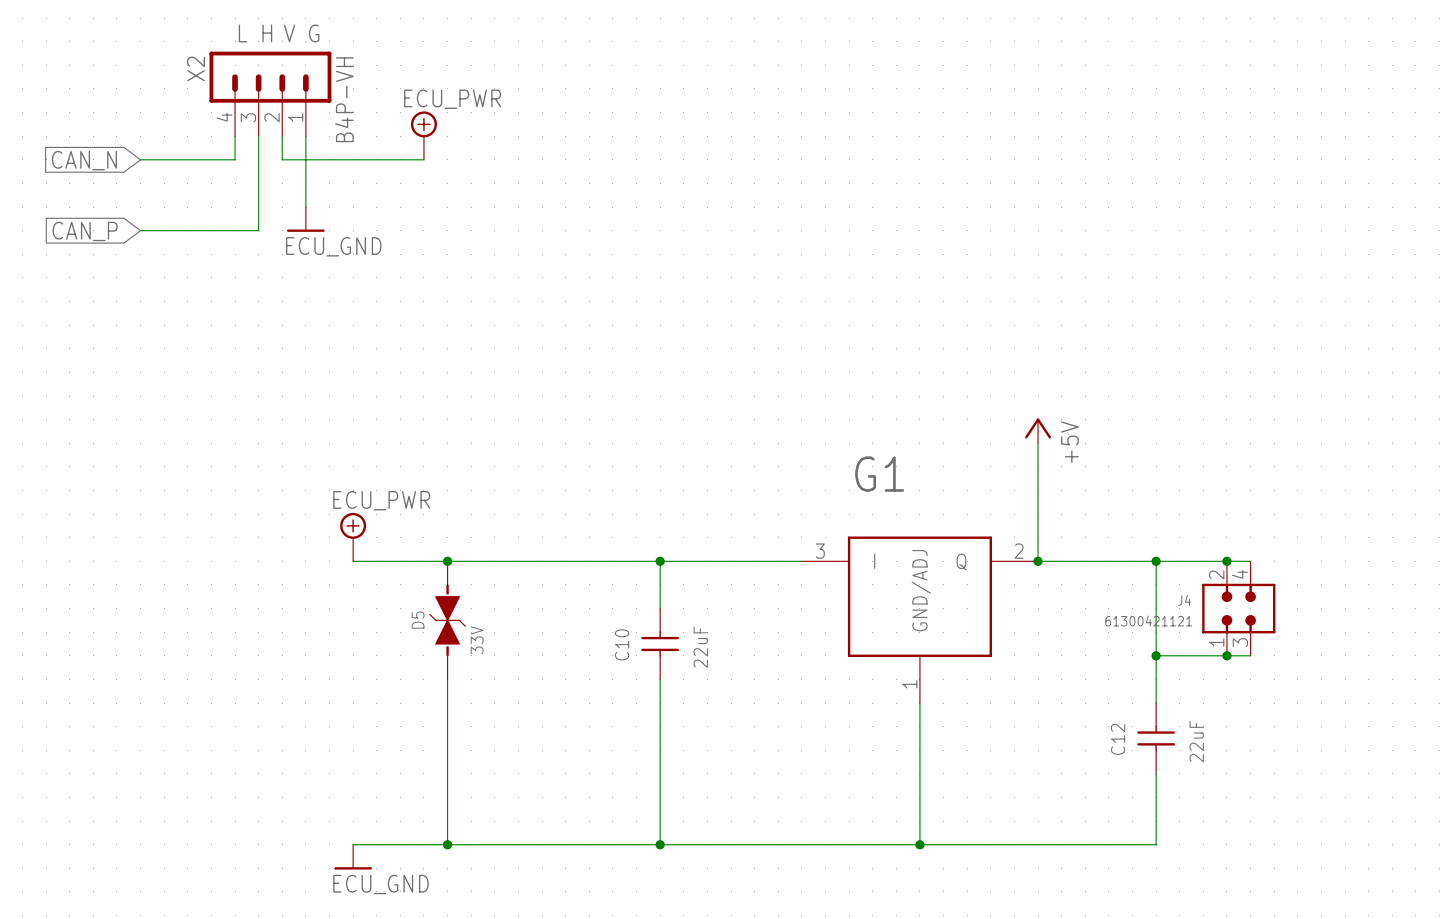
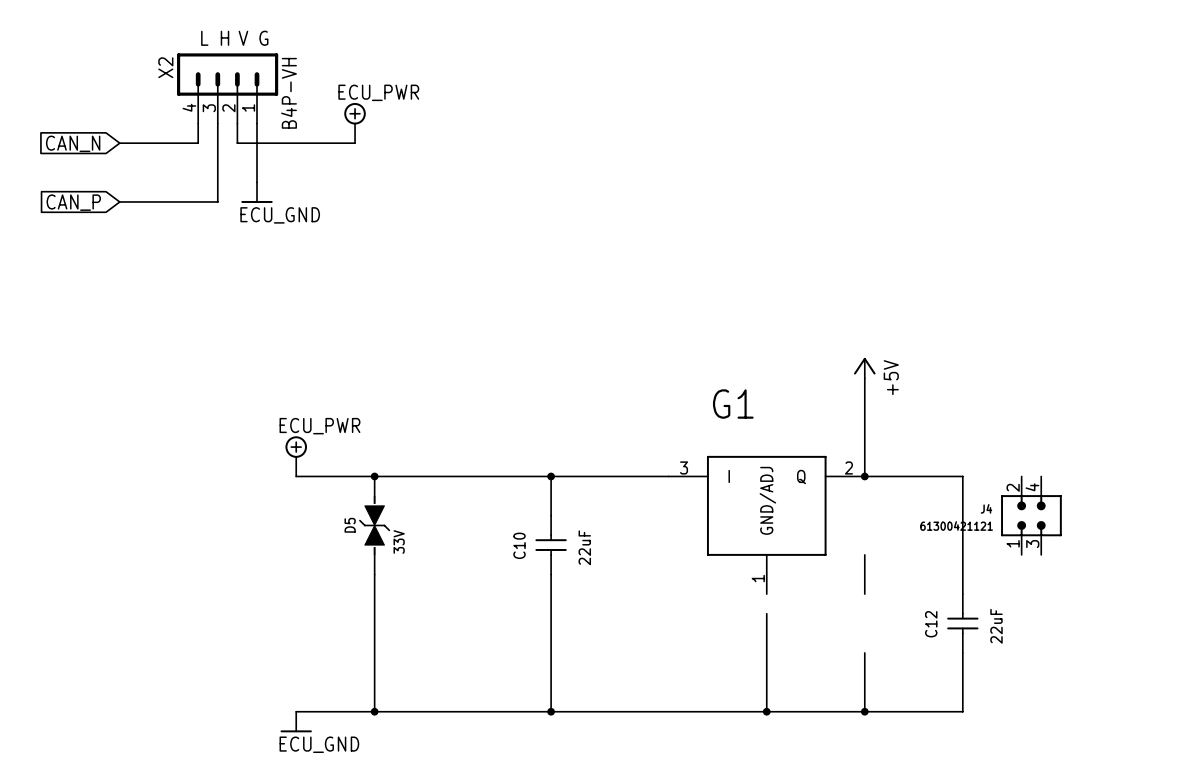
wire: (1156, 561) (1250, 561) -> none
junction: (1156, 561) -> none
junction: (1226, 561) -> none
wire: none -> (864, 554) (864, 594)
wire: (1156, 655) (1250, 655) -> none
junction: (1156, 655) -> none
junction: (1226, 655) -> none
wire: (919, 703) (919, 726) -> none
wire: none -> (864, 652) (864, 711)
junction: none -> (864, 711)

